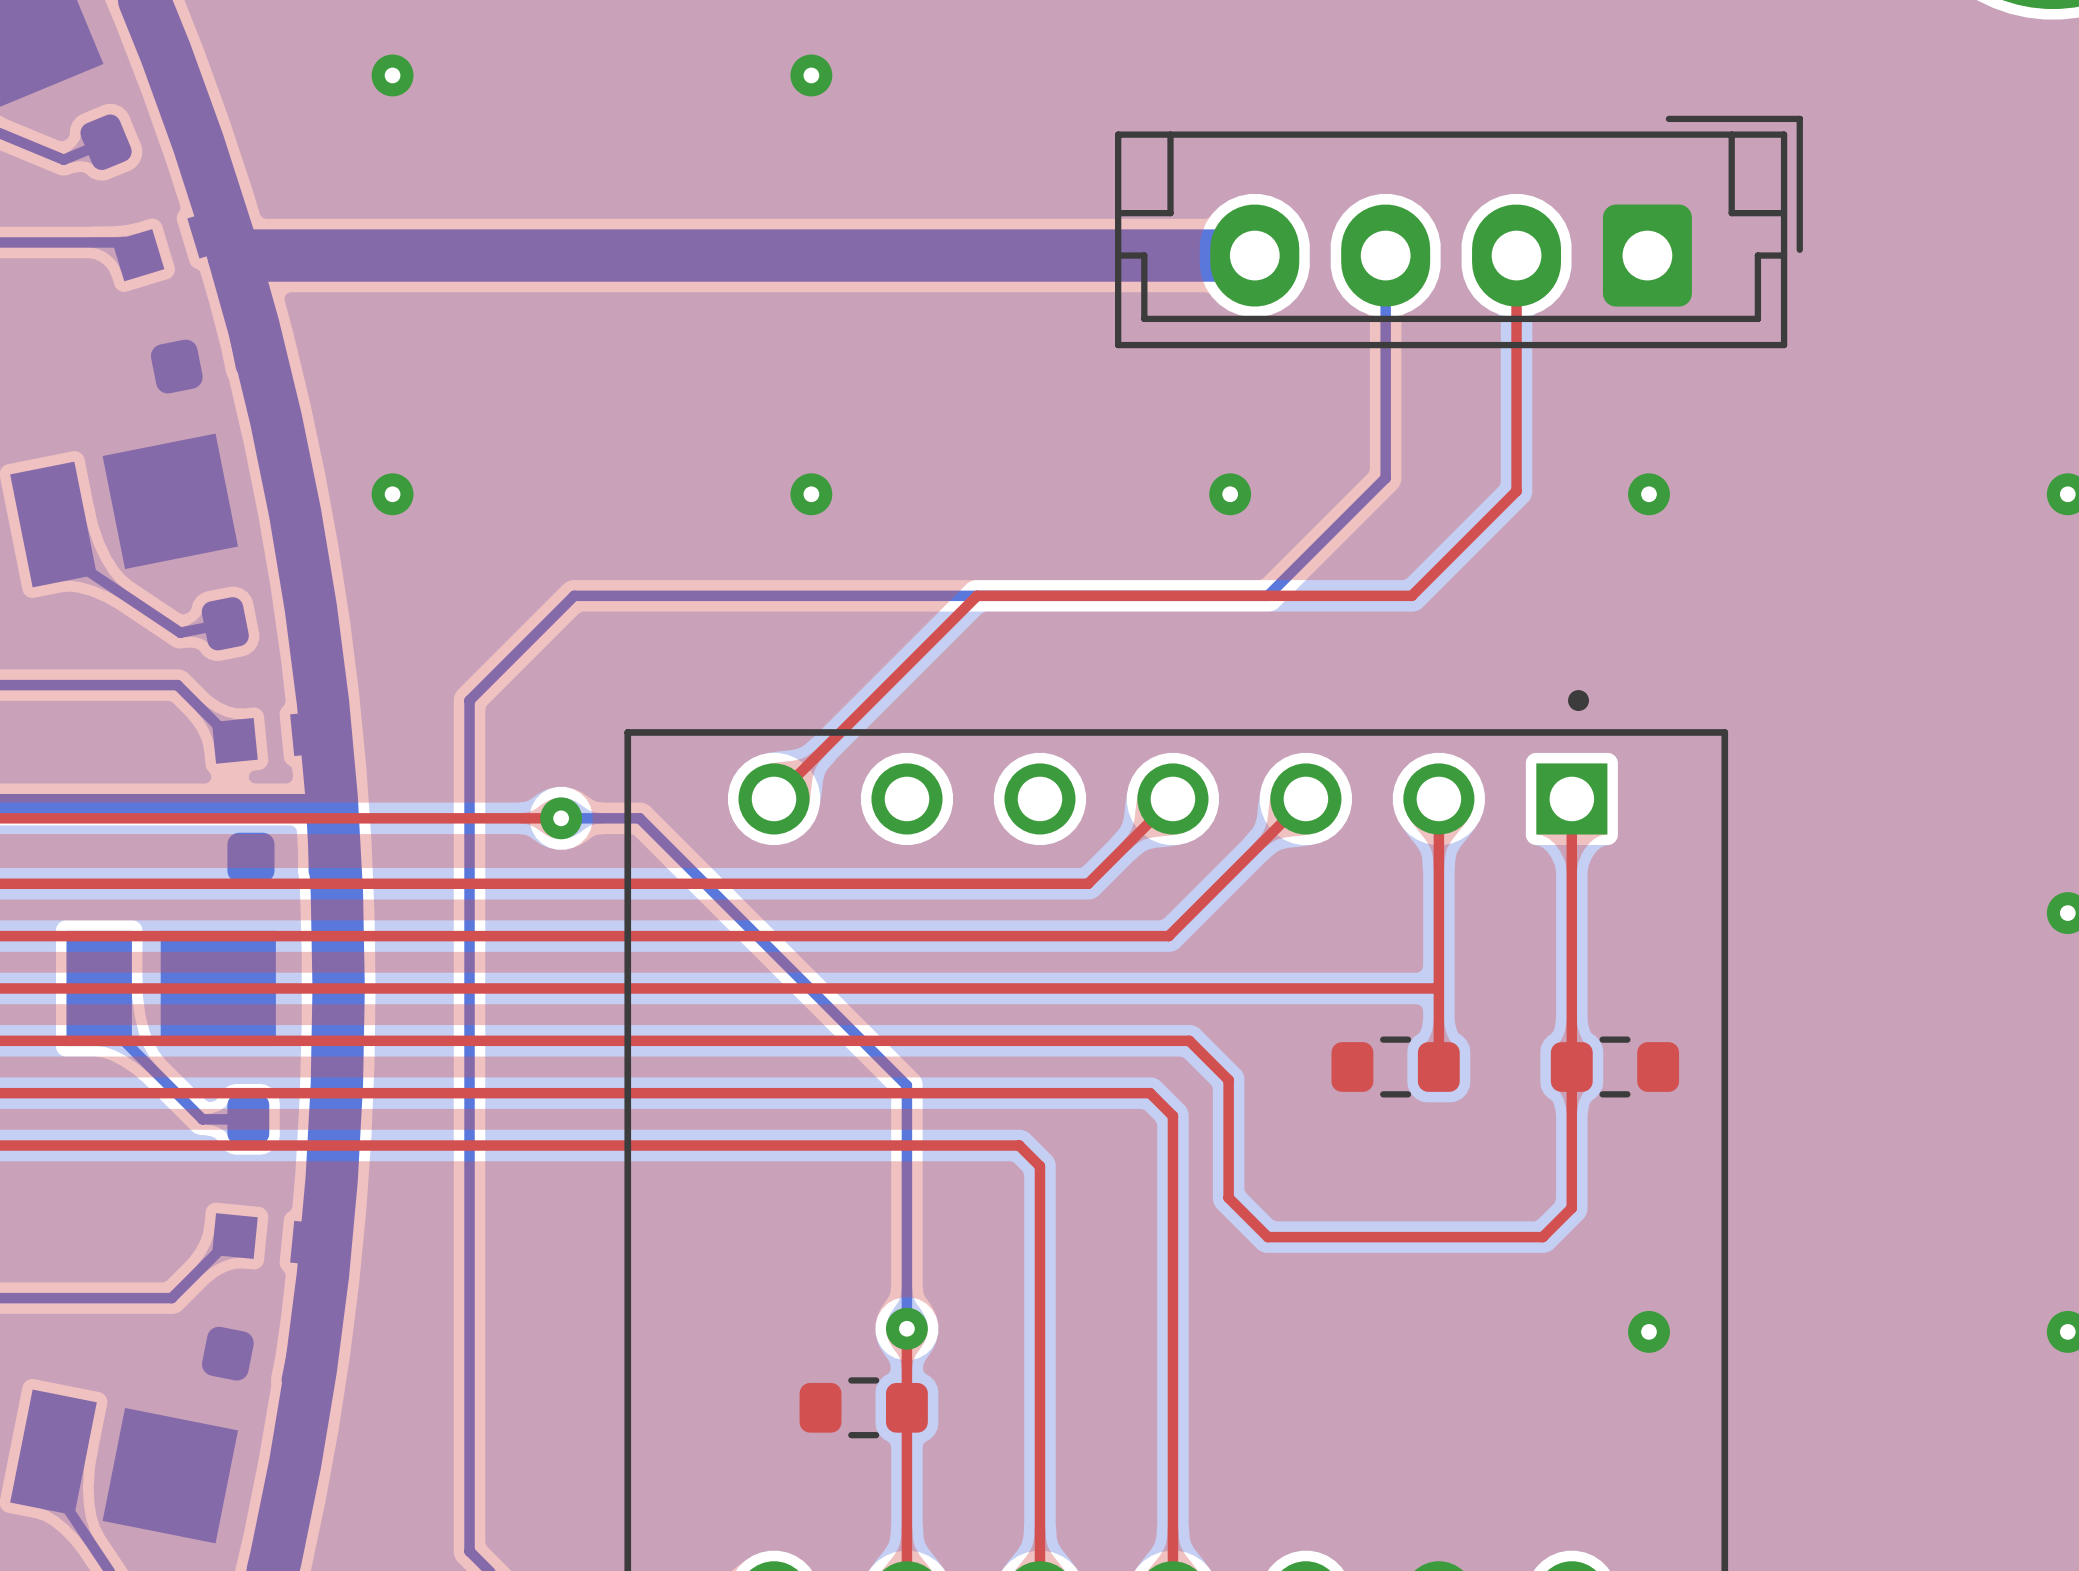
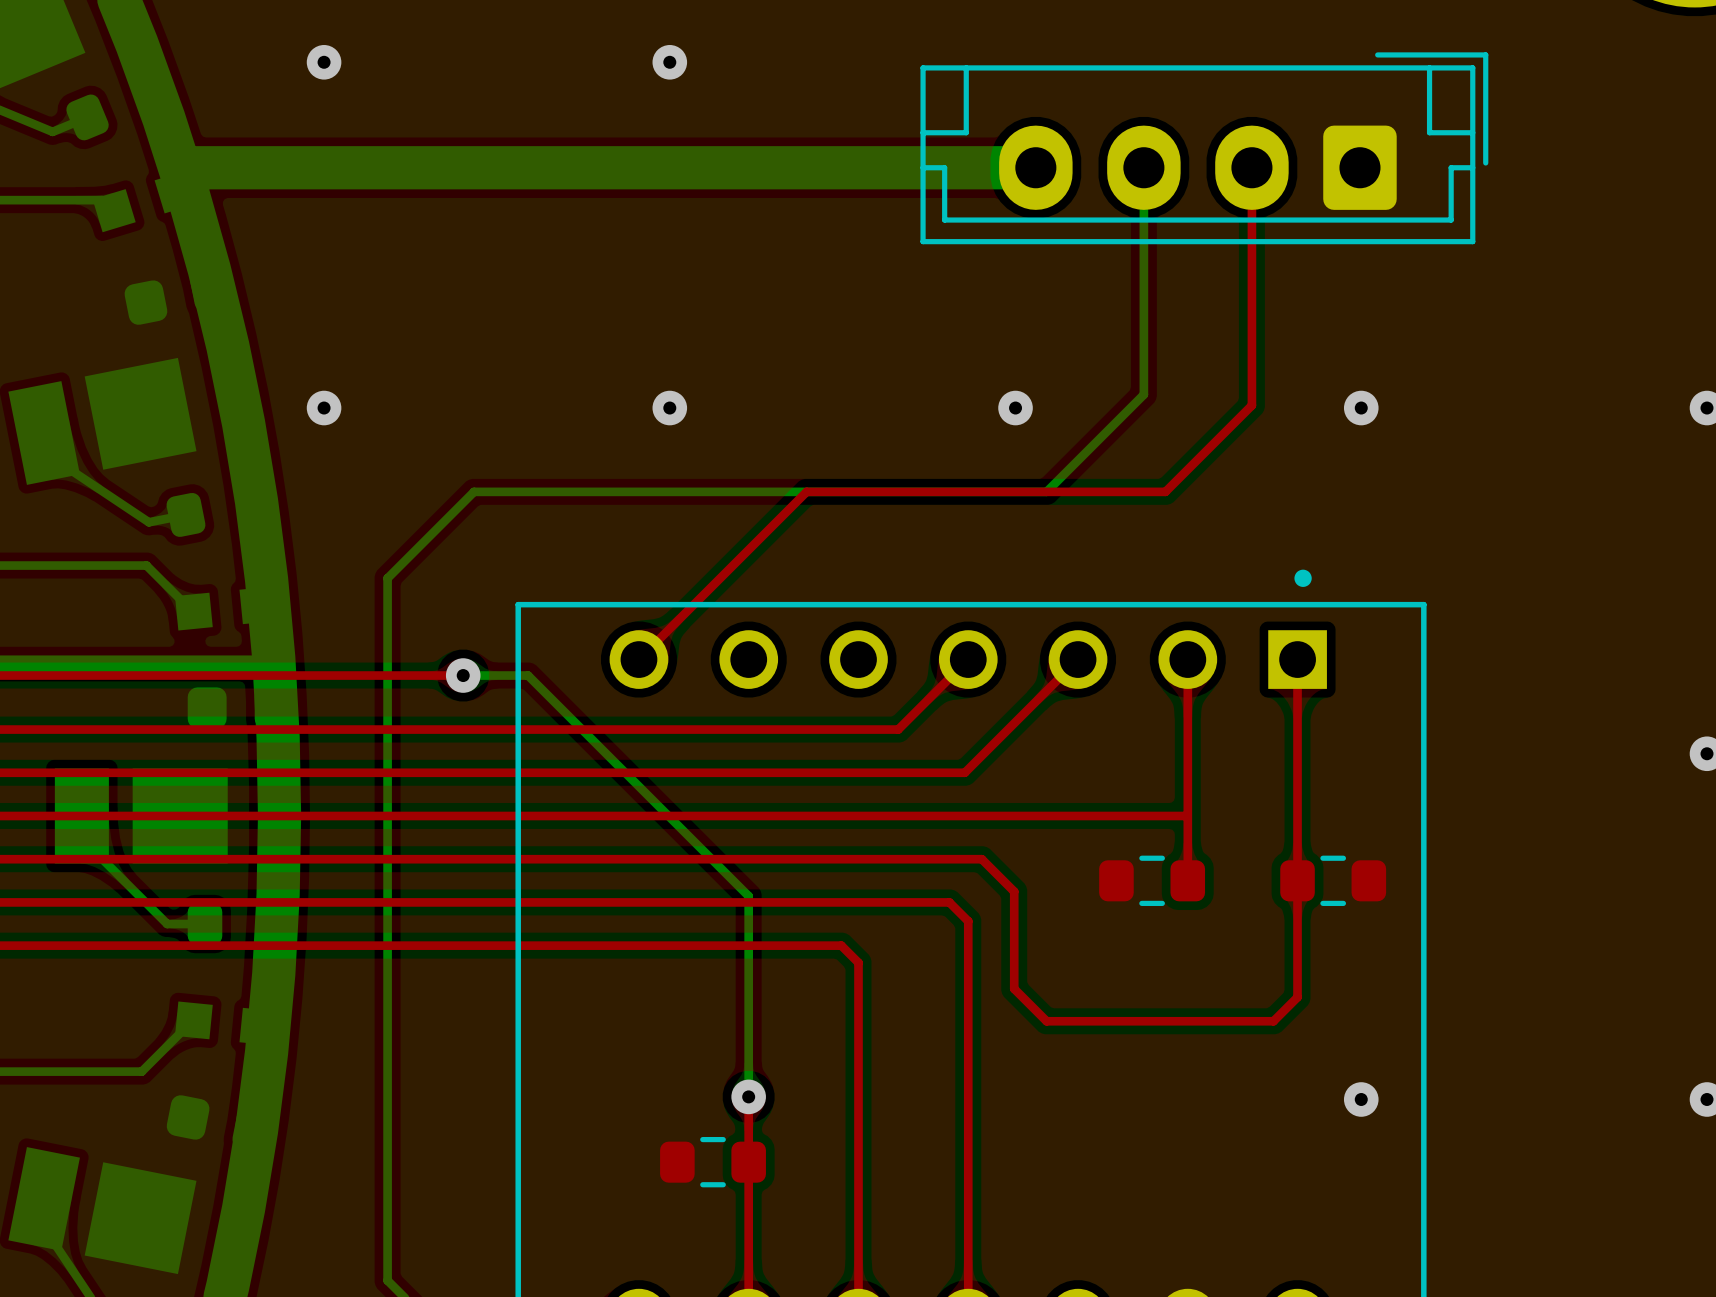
bottom track: none -> (182, 167) (1035, 167)
part position: (1458, 231) -> (1204, 148)
bottom track: (233, 255) (1254, 255) -> none

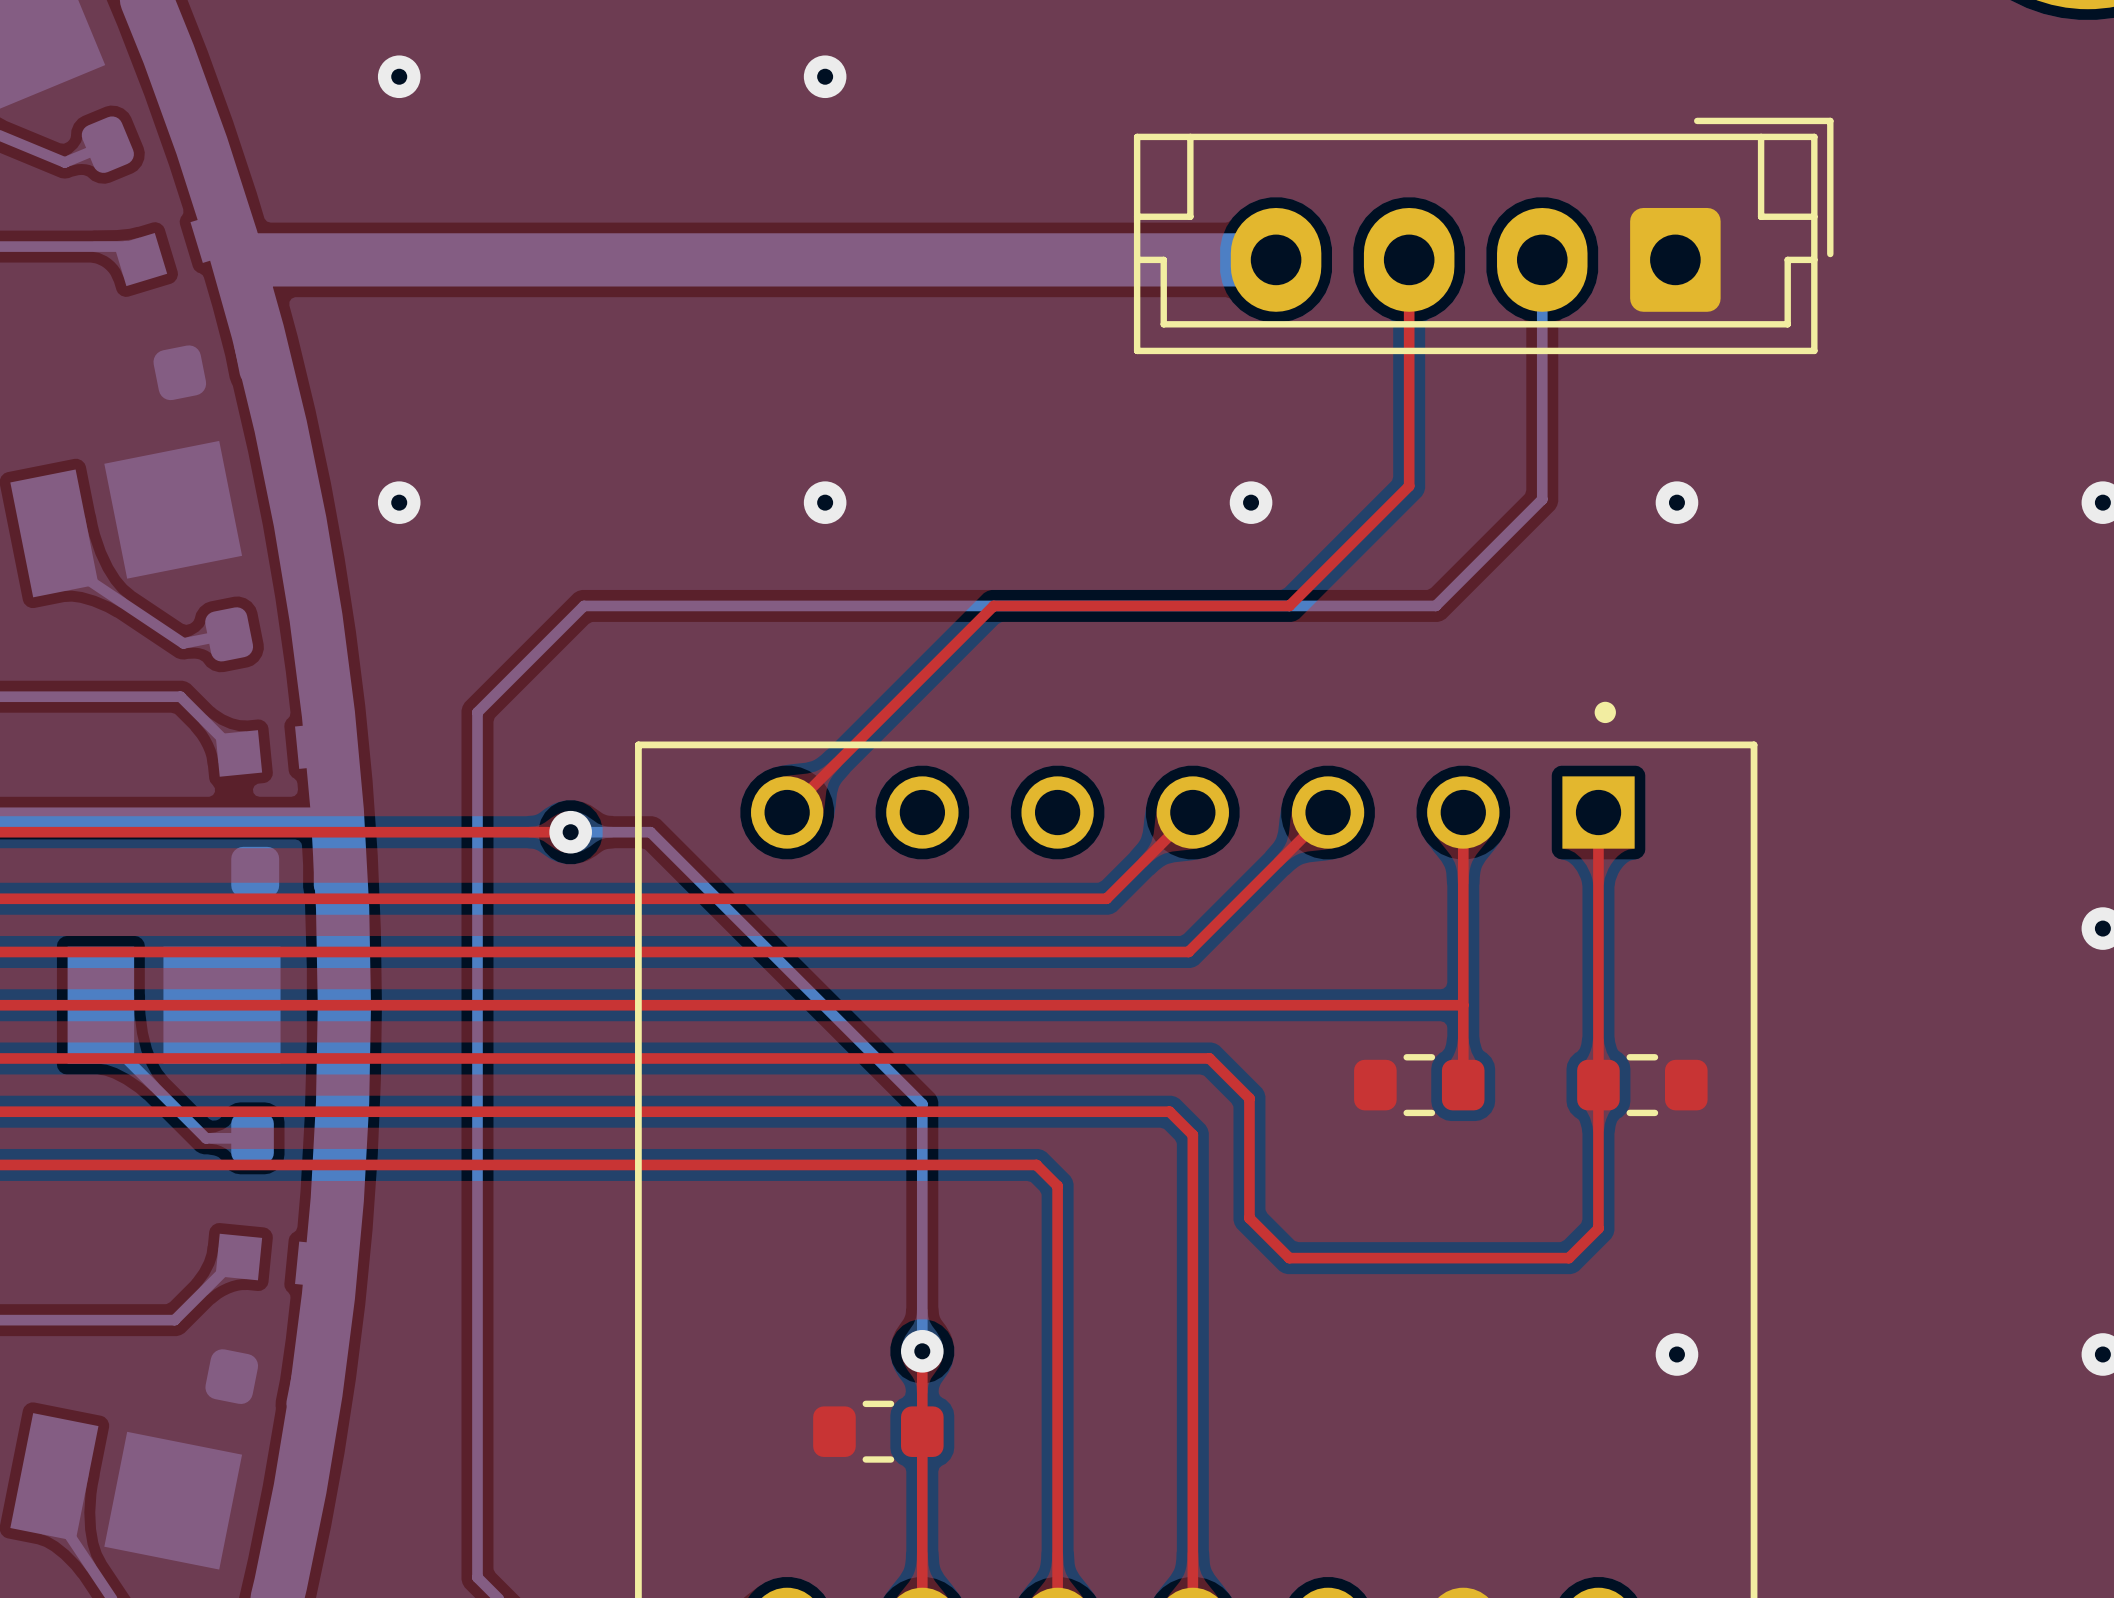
part position: (1204, 148) -> (1483, 235)
bottom track: (182, 167) (1035, 167) -> none
bottom track: (1143, 167) (1143, 394) (1046, 491) -> (1542, 259) (1542, 499) (1435, 605) (1289, 605)
top track: (1251, 167) (1251, 405) (1165, 491) (1046, 491) -> (1409, 259) (1409, 486) (1289, 605)
bottom track: none -> (251, 259) (1276, 259)

